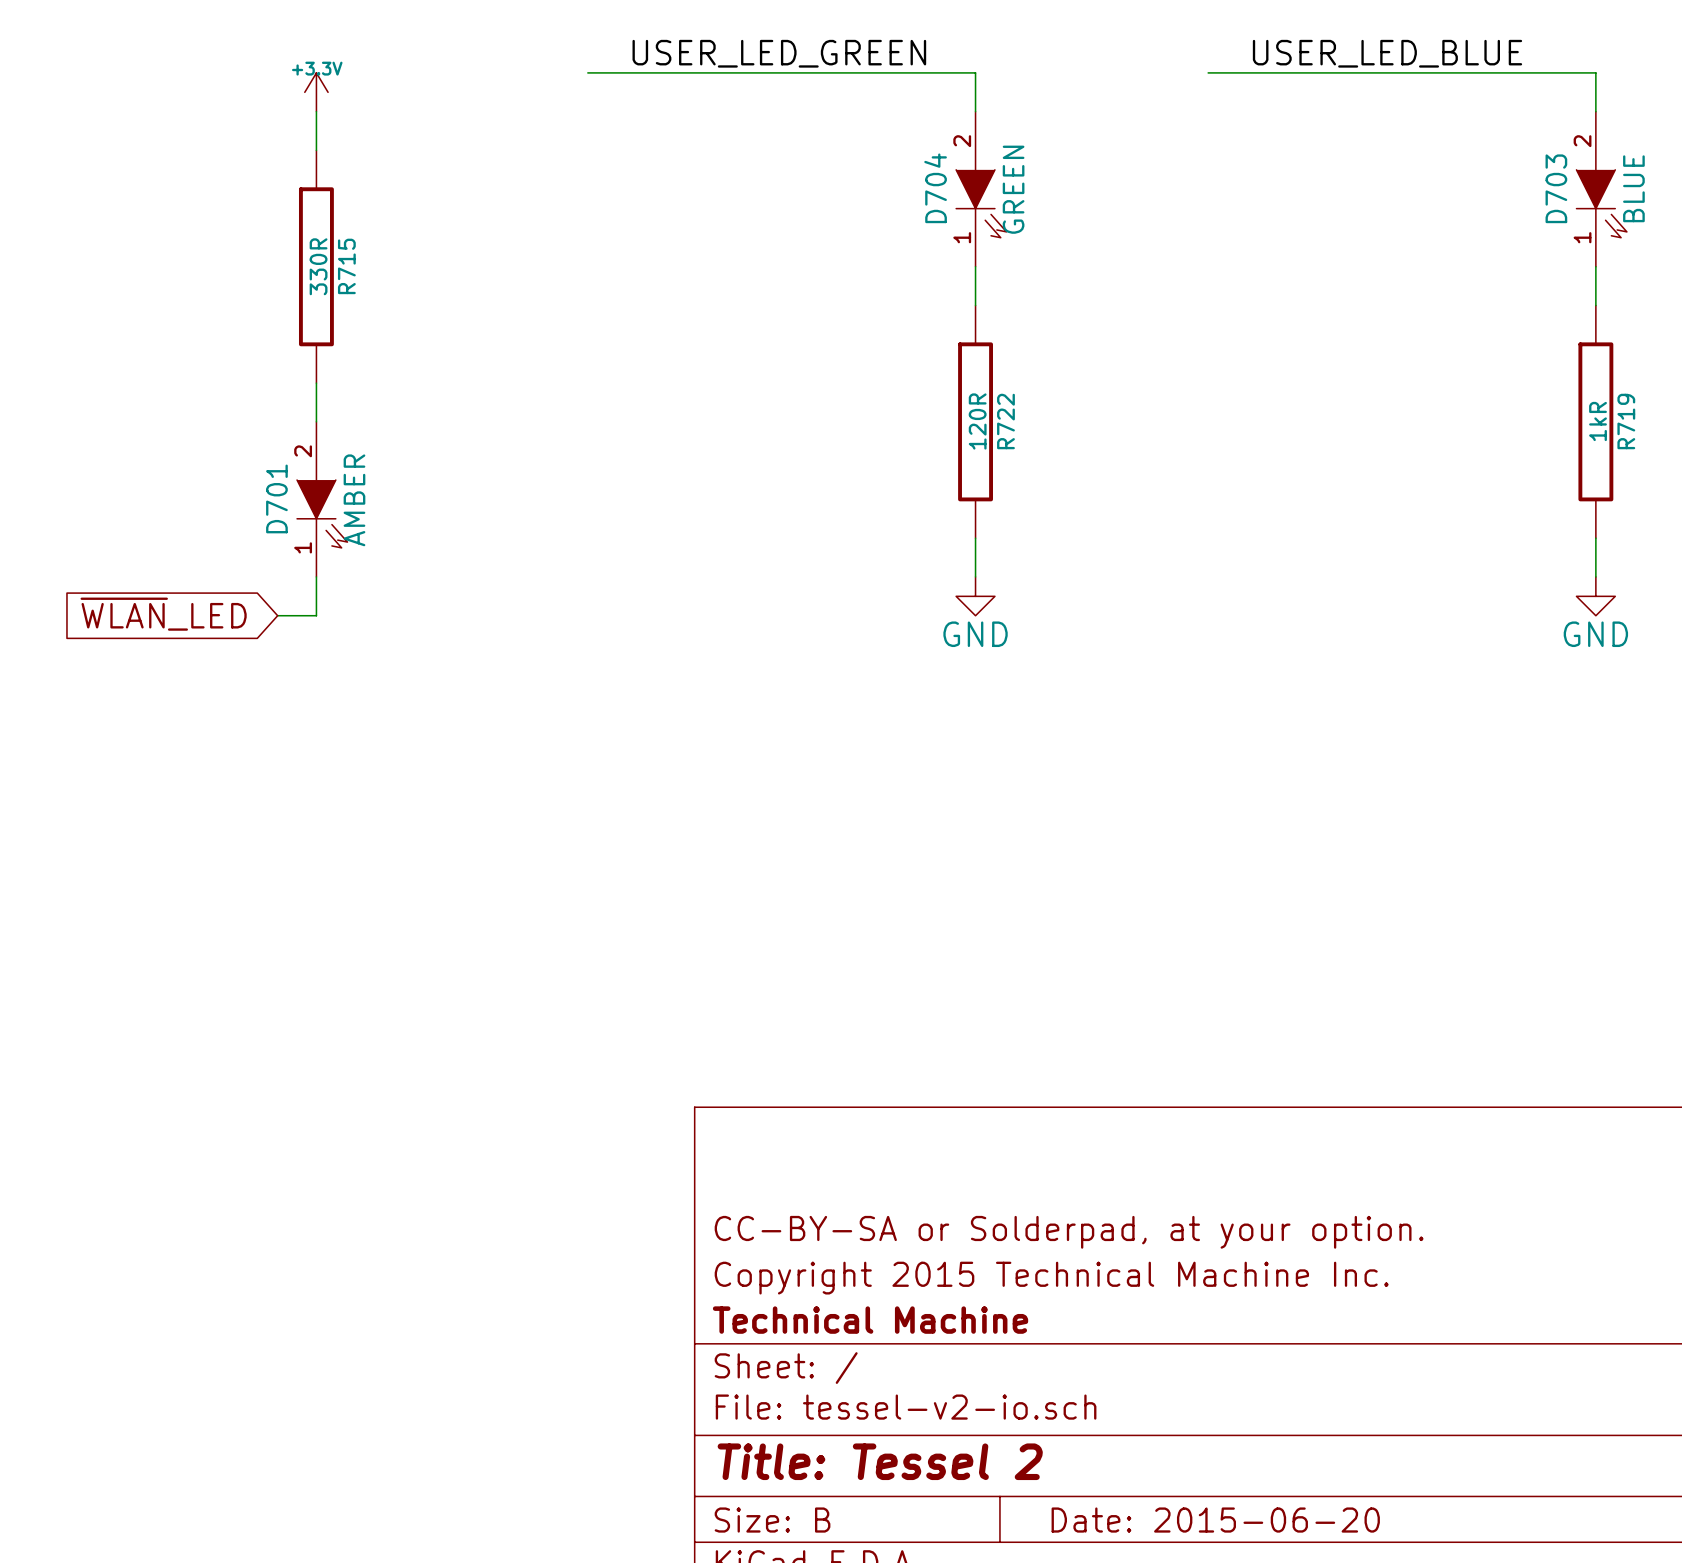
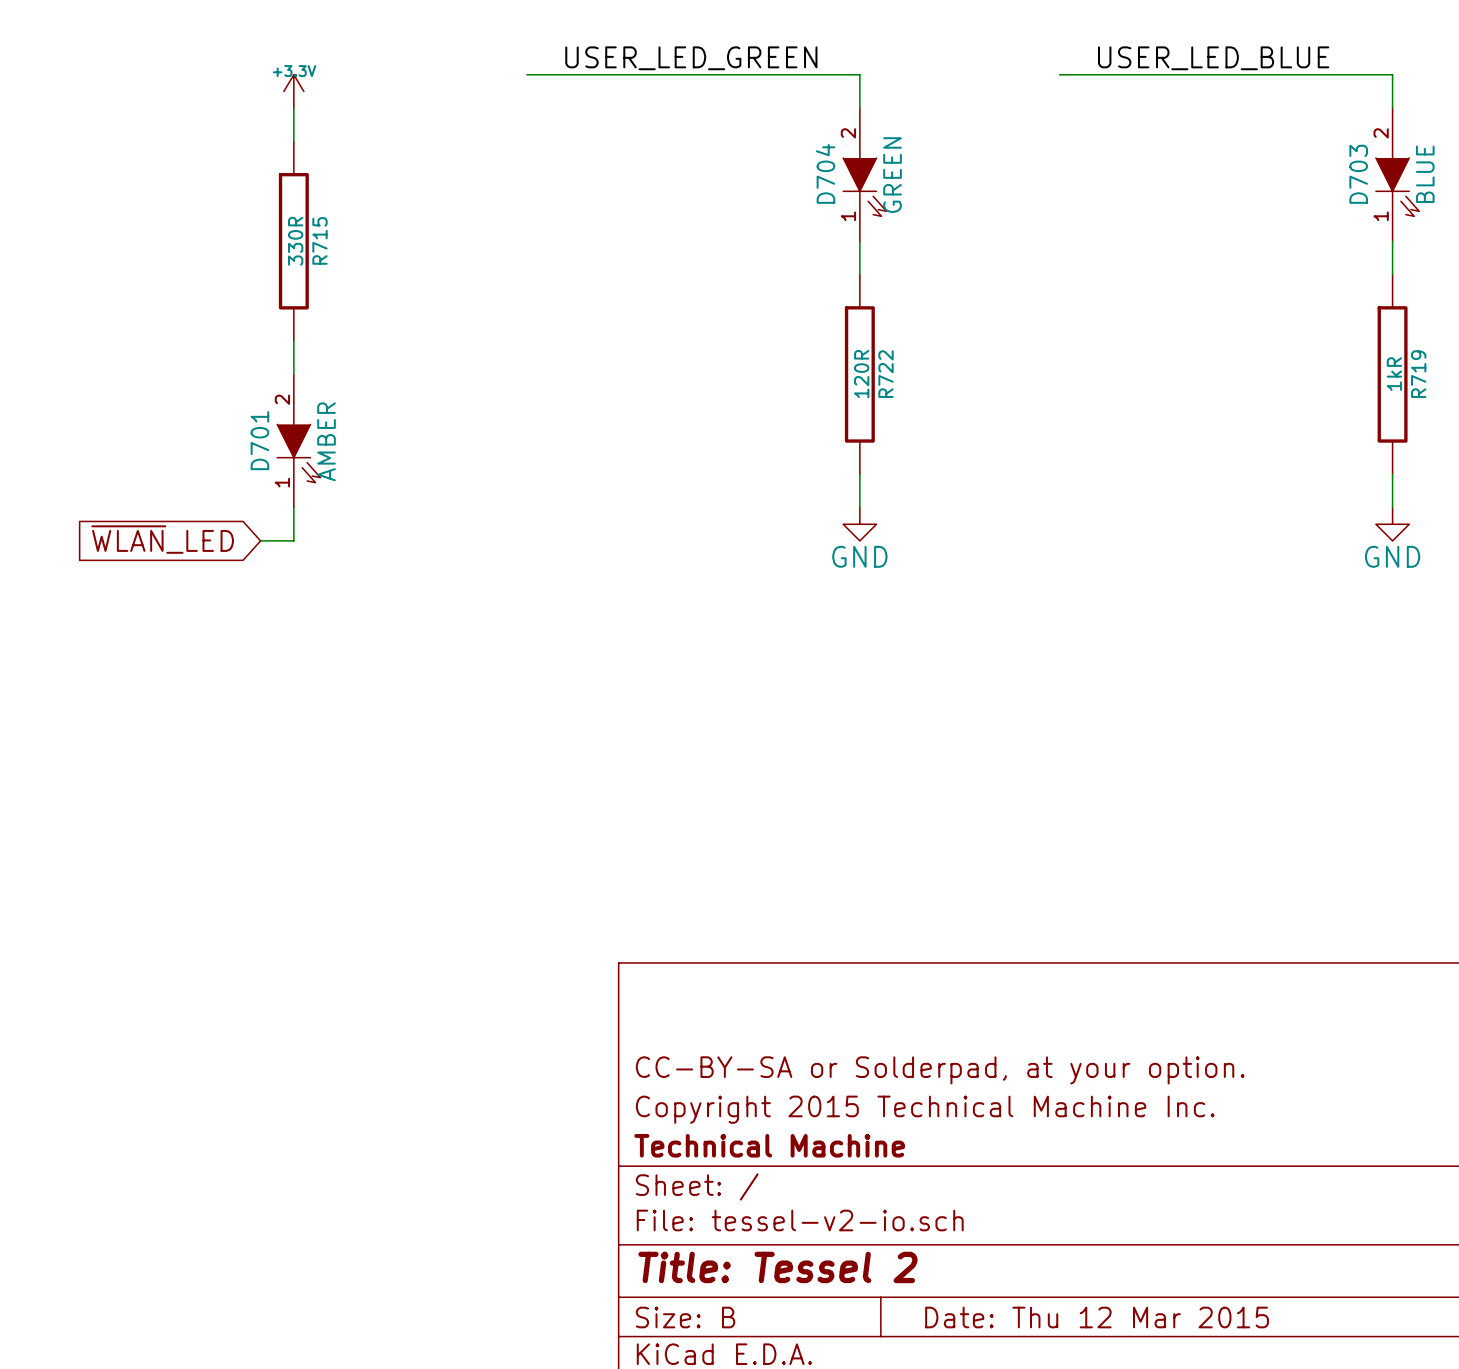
title block: Date: 2015-06-20 (1215, 1520) -> Date: Thu 12 Mar 2015 (1097, 1317)

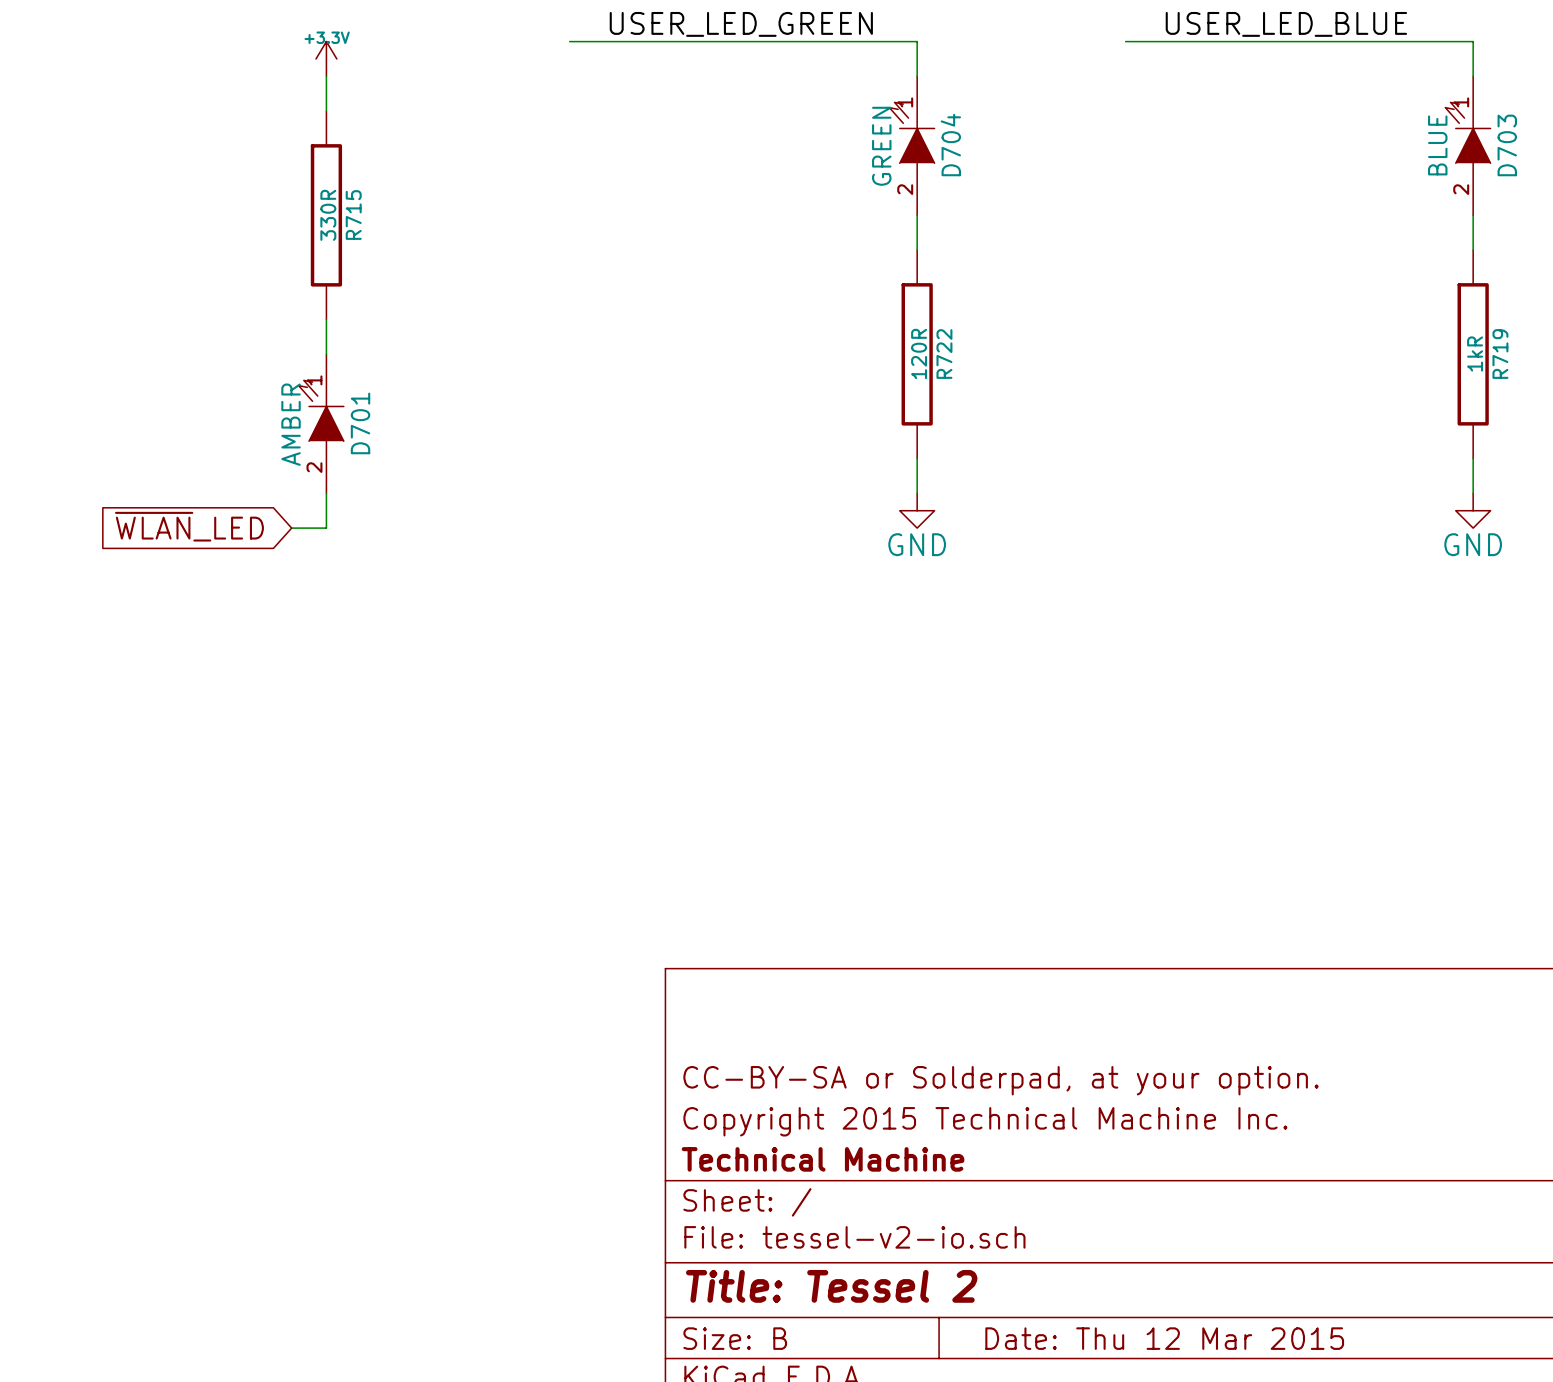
D704 rotation: 0° (864, 187) -> 180° (911, 132)
D703 rotation: 0° (1397, 187) -> 180° (1467, 132)
D701 rotation: 0° (298, 453) -> 180° (321, 410)

